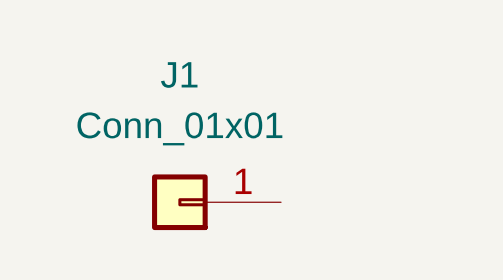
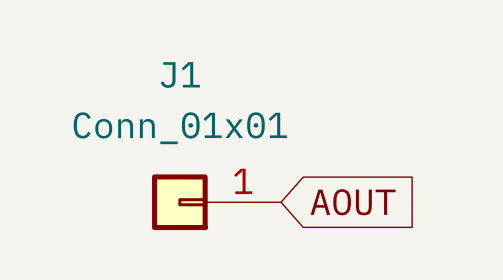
global label: none -> AOUT (353, 202)

